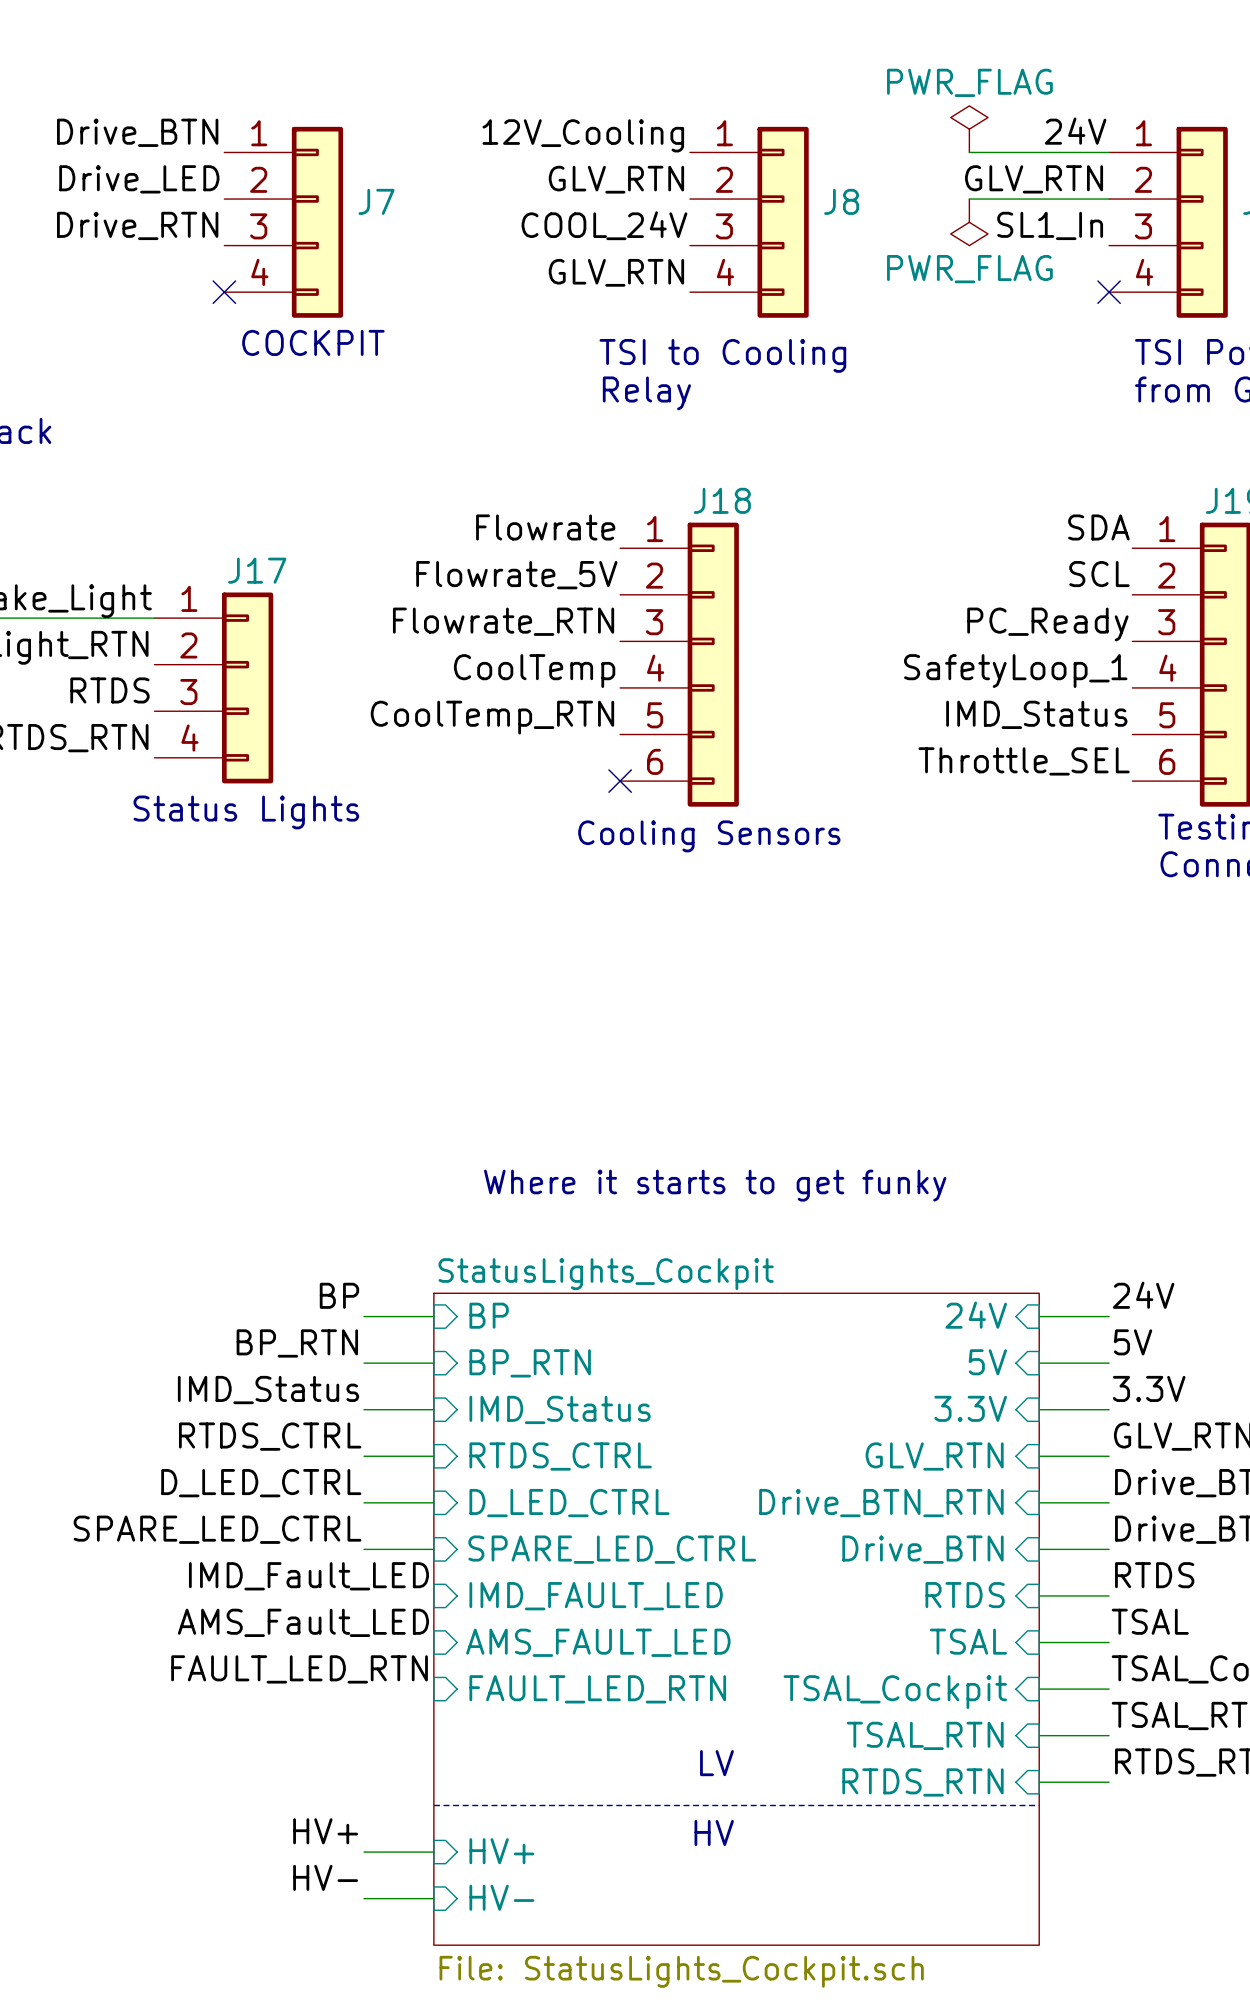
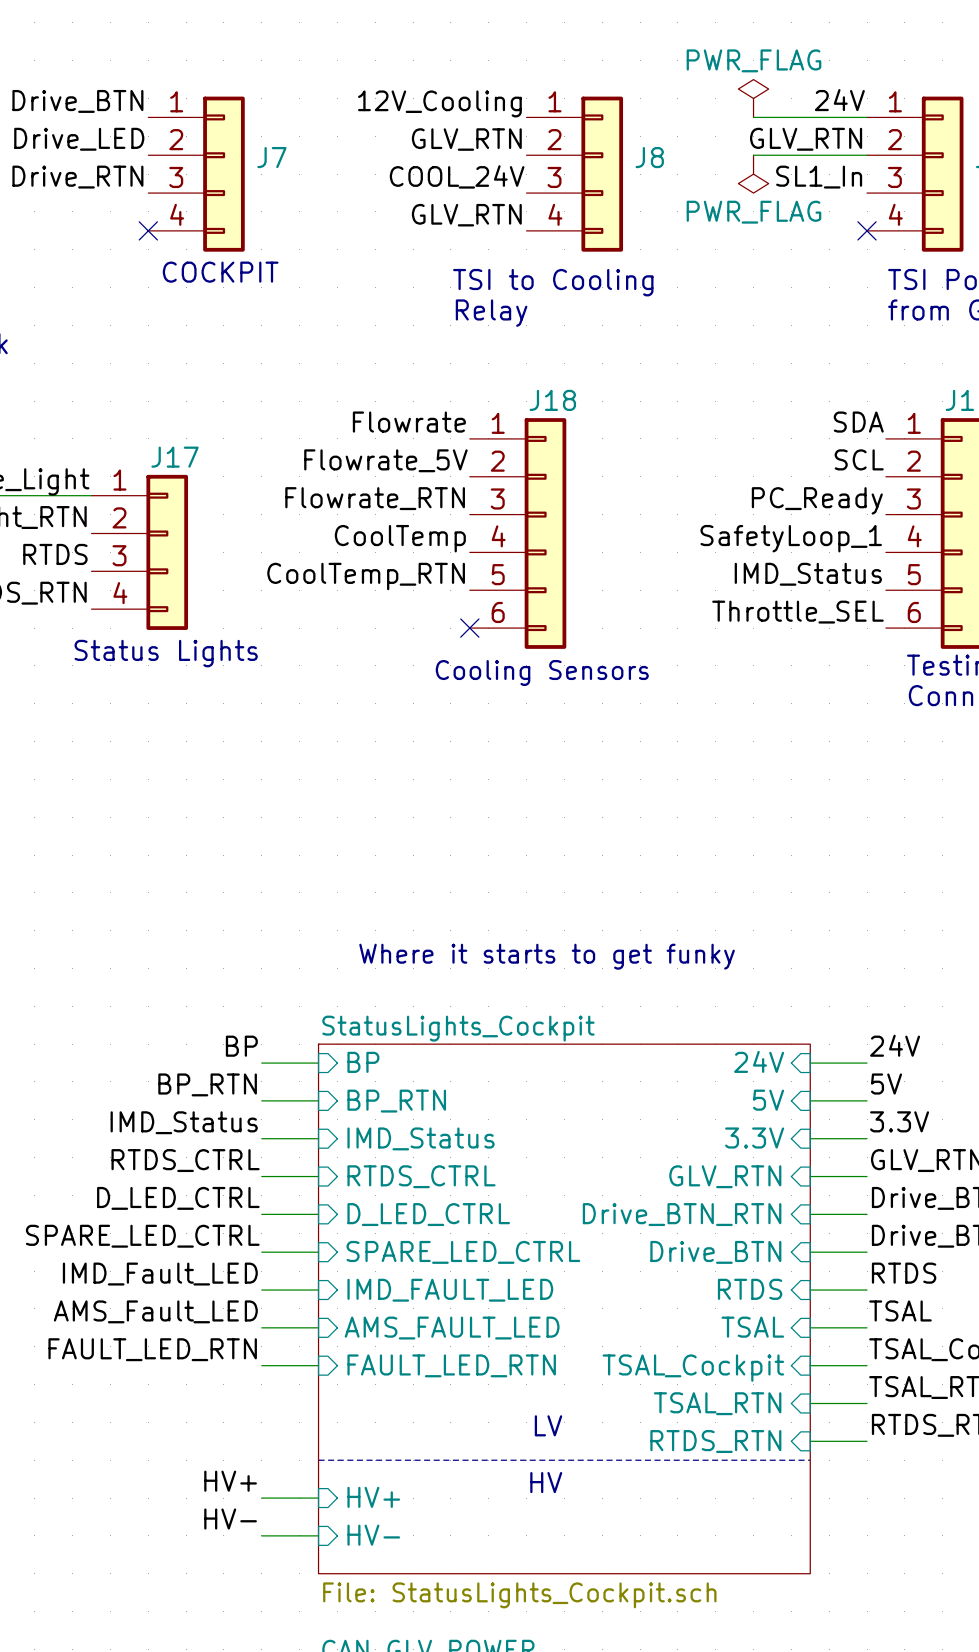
label position: IMD_Fault_LED (308, 1576) -> IMD_Fault_LED (160, 1274)
wire: none -> (261, 1290) (318, 1290)
label position: AMS_Fault_LED (303, 1622) -> AMS_Fault_LED (155, 1311)
wire: none -> (261, 1327) (318, 1327)
label position: FAULT_LED_RTN (299, 1669) -> FAULT_LED_RTN (152, 1349)
wire: none -> (261, 1365) (318, 1365)

